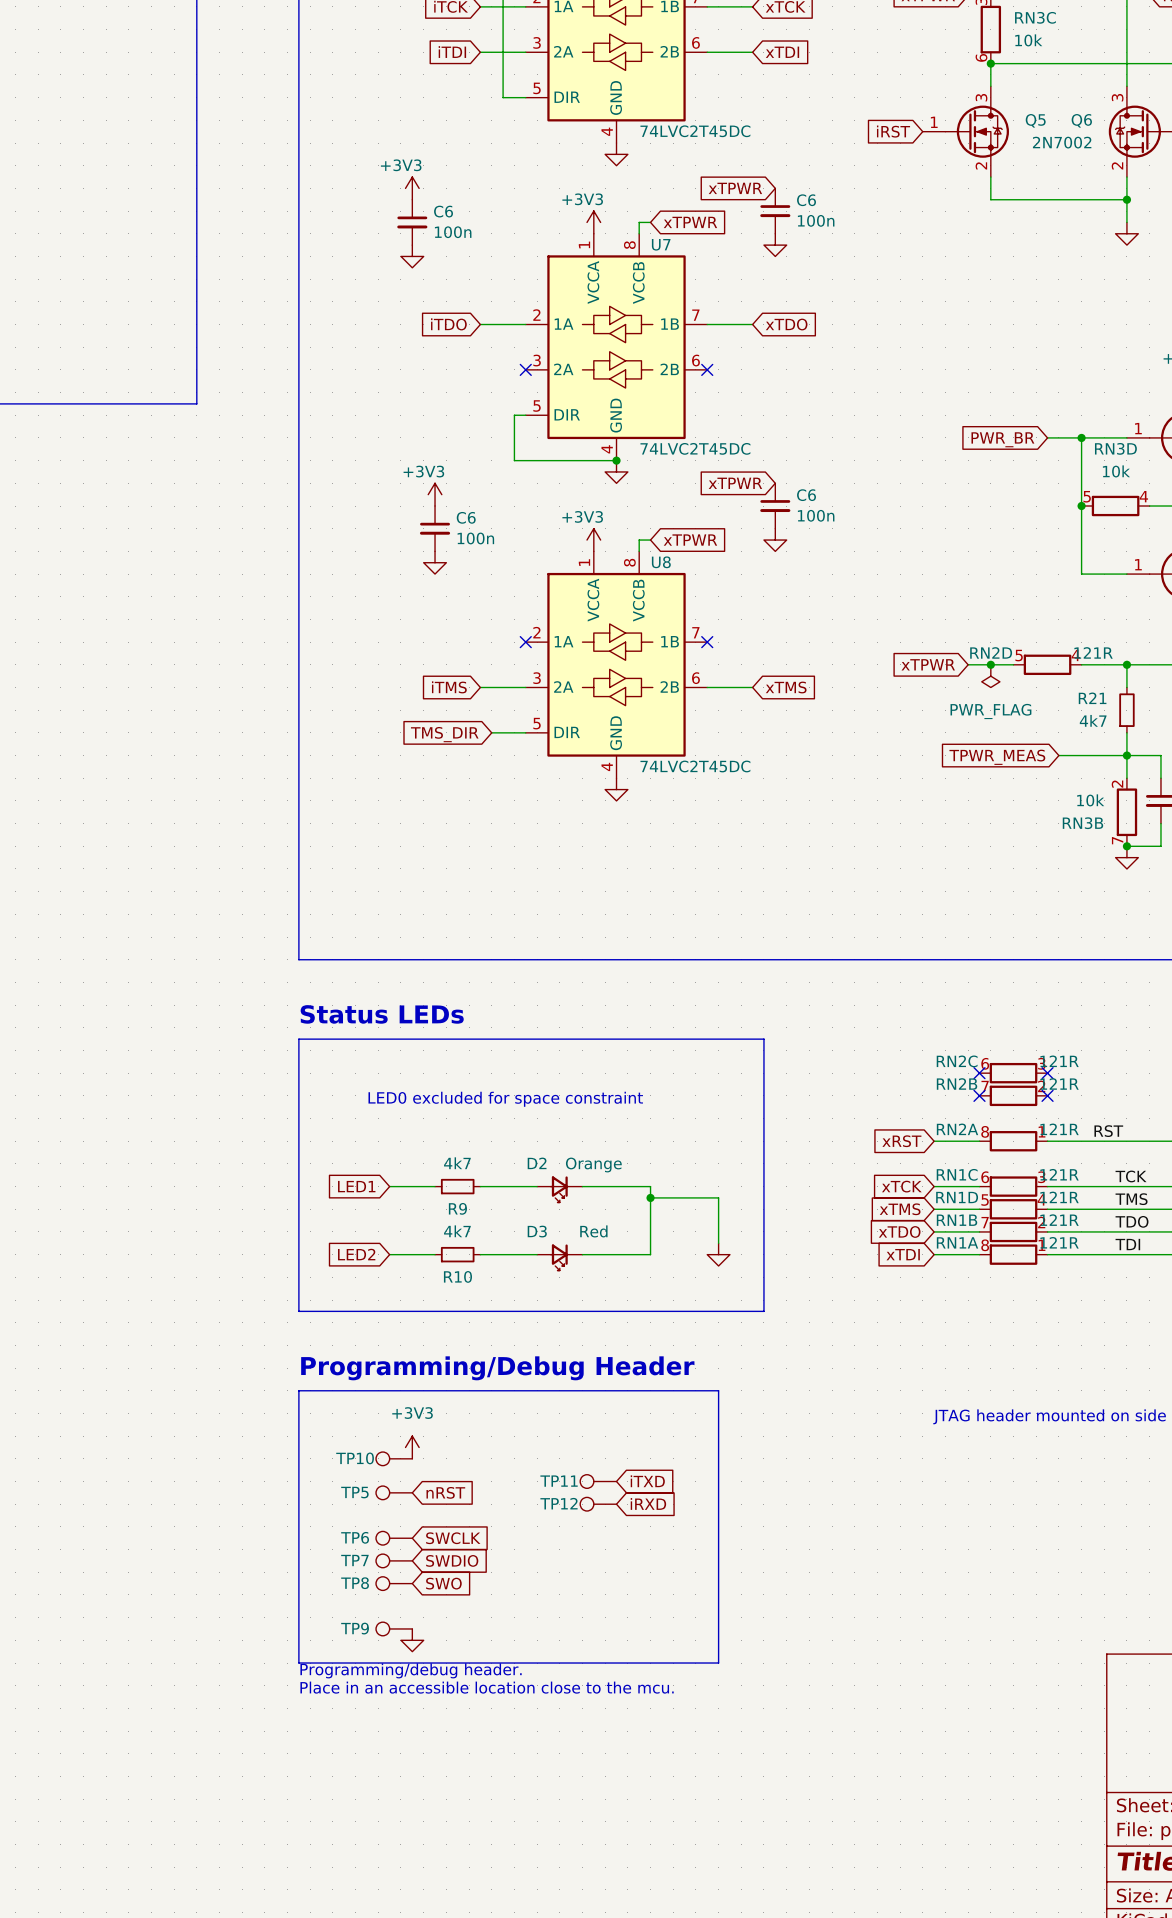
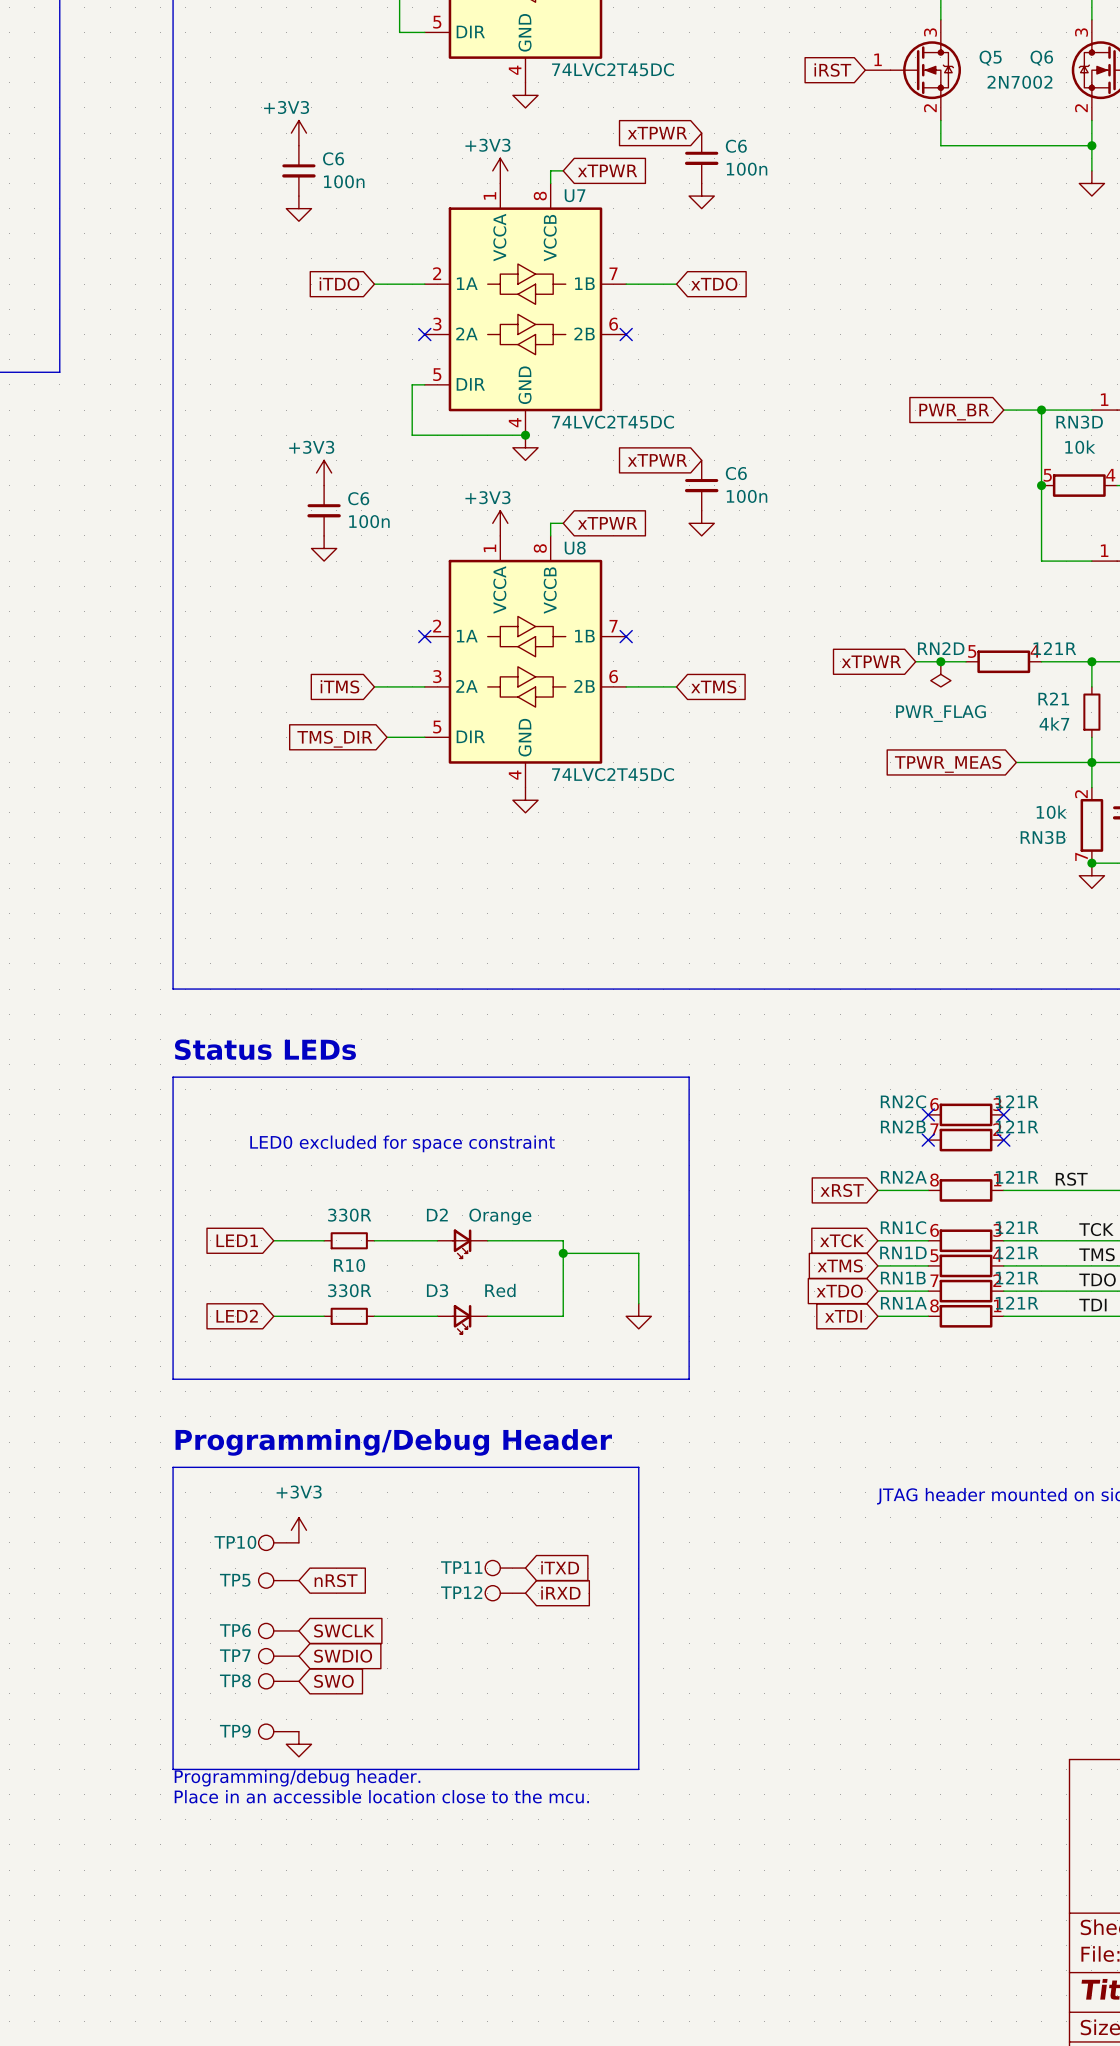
R9 value: 4k7 (457, 1163) -> 330R (349, 1215)
R9 name: R9 (457, 1208) -> none
R10 value: 4k7 (457, 1231) -> 330R (349, 1290)
R10 name position: R10 (457, 1276) -> R10 (349, 1265)

